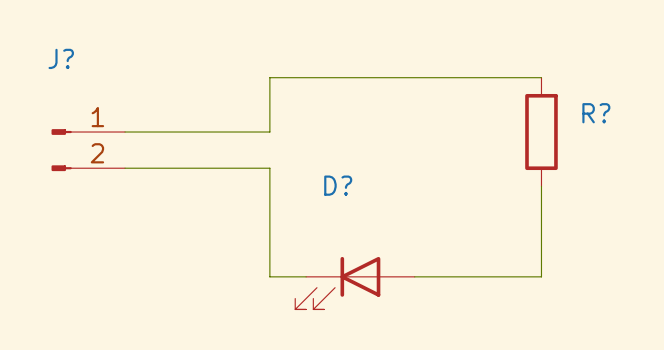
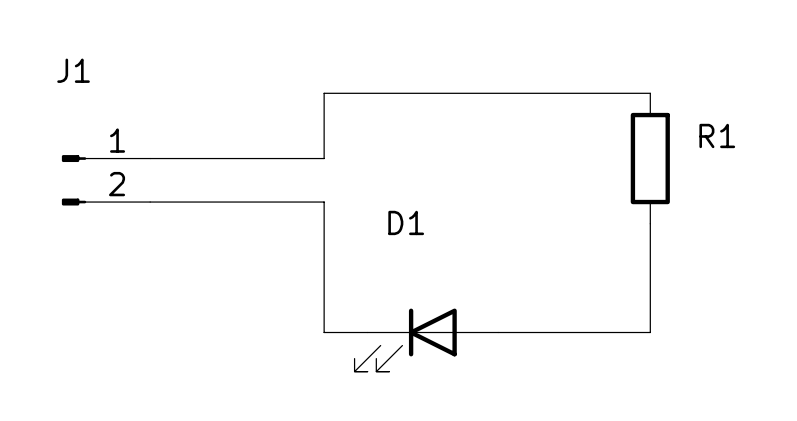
J? name: J? (61, 58) -> J1 (73, 70)
R? name: R? (596, 113) -> R1 (717, 135)
D? name: D? (338, 185) -> D1 (406, 222)

